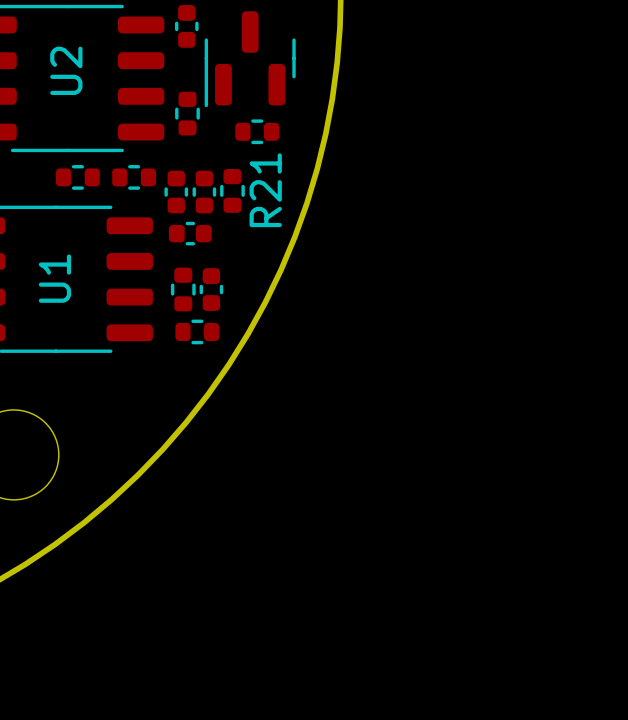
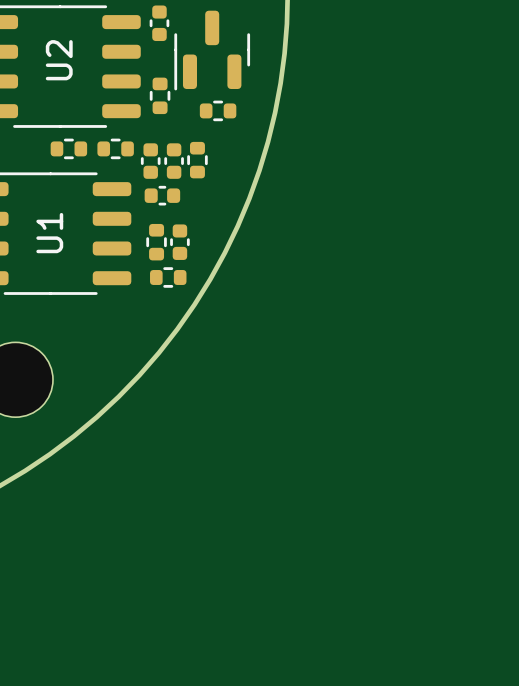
R21 name: R21 (265, 190) -> none

